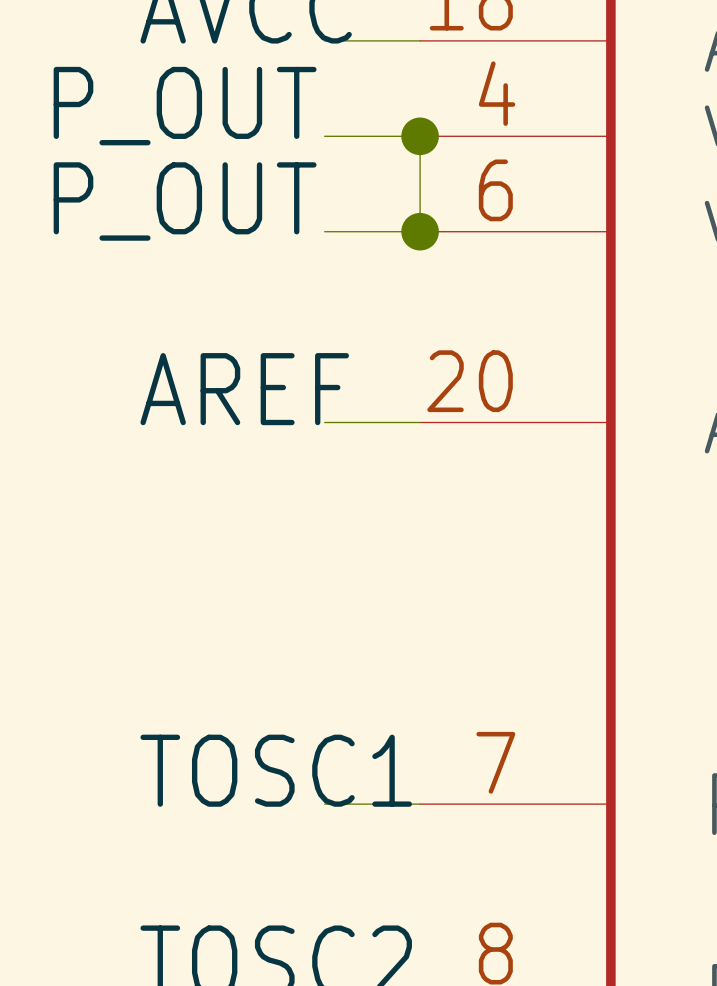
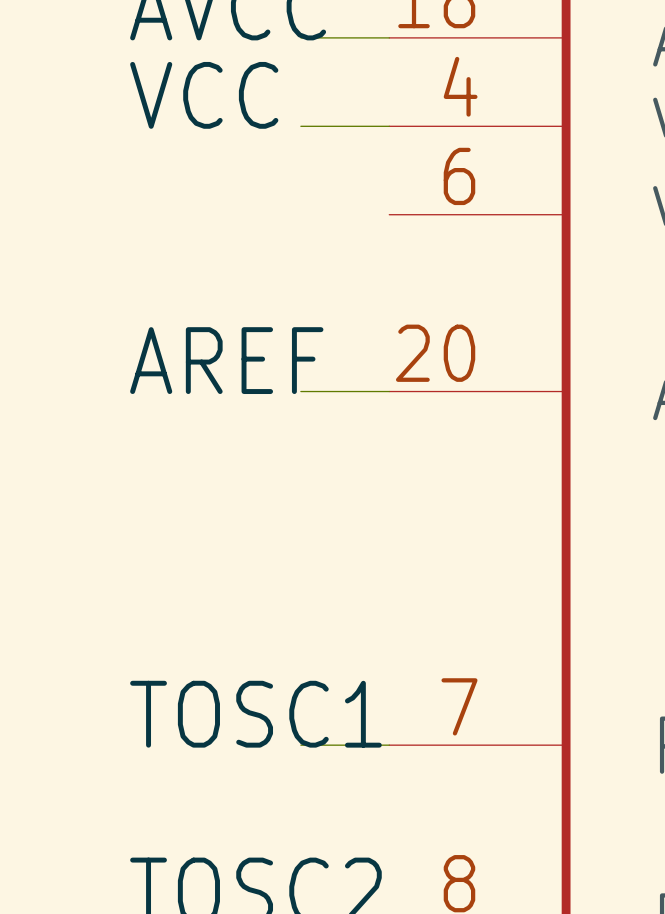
label: none -> VCC (204, 95)
label: P_OUT (185, 106) -> none
wire: (420, 136) (420, 231) (324, 231) -> none
junction: (420, 136) -> none
label: P_OUT (185, 201) -> none
junction: (420, 231) -> none

